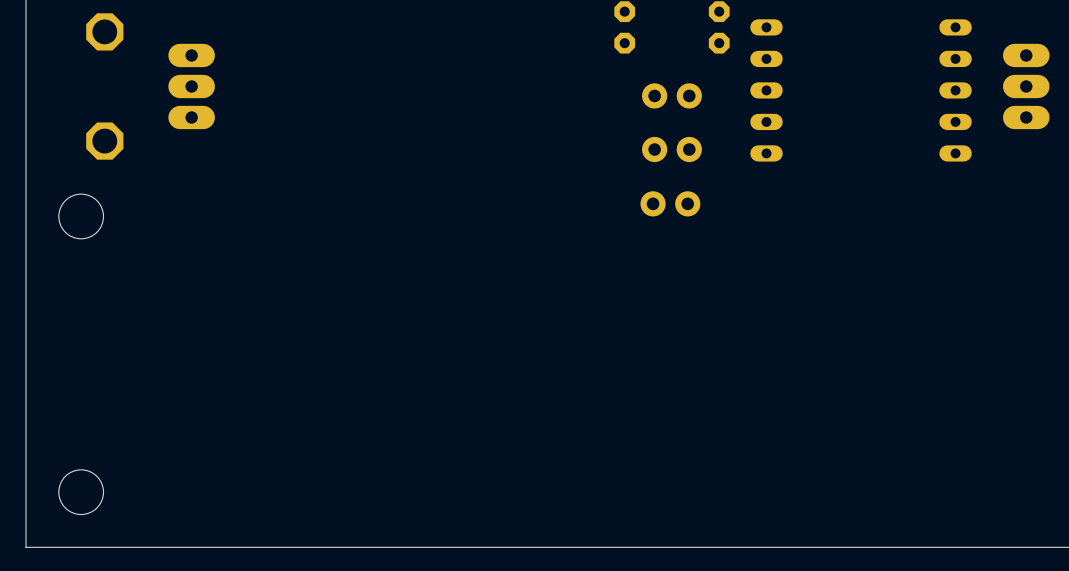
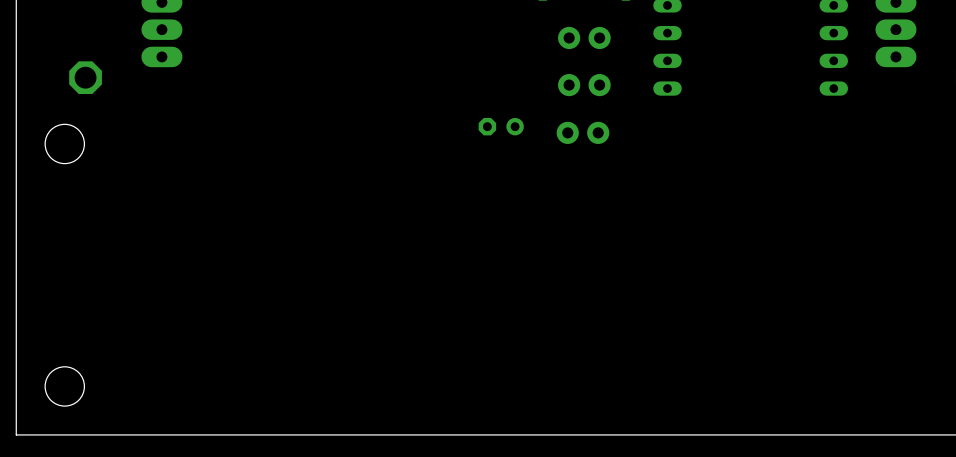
part: none -> (501, 126)

